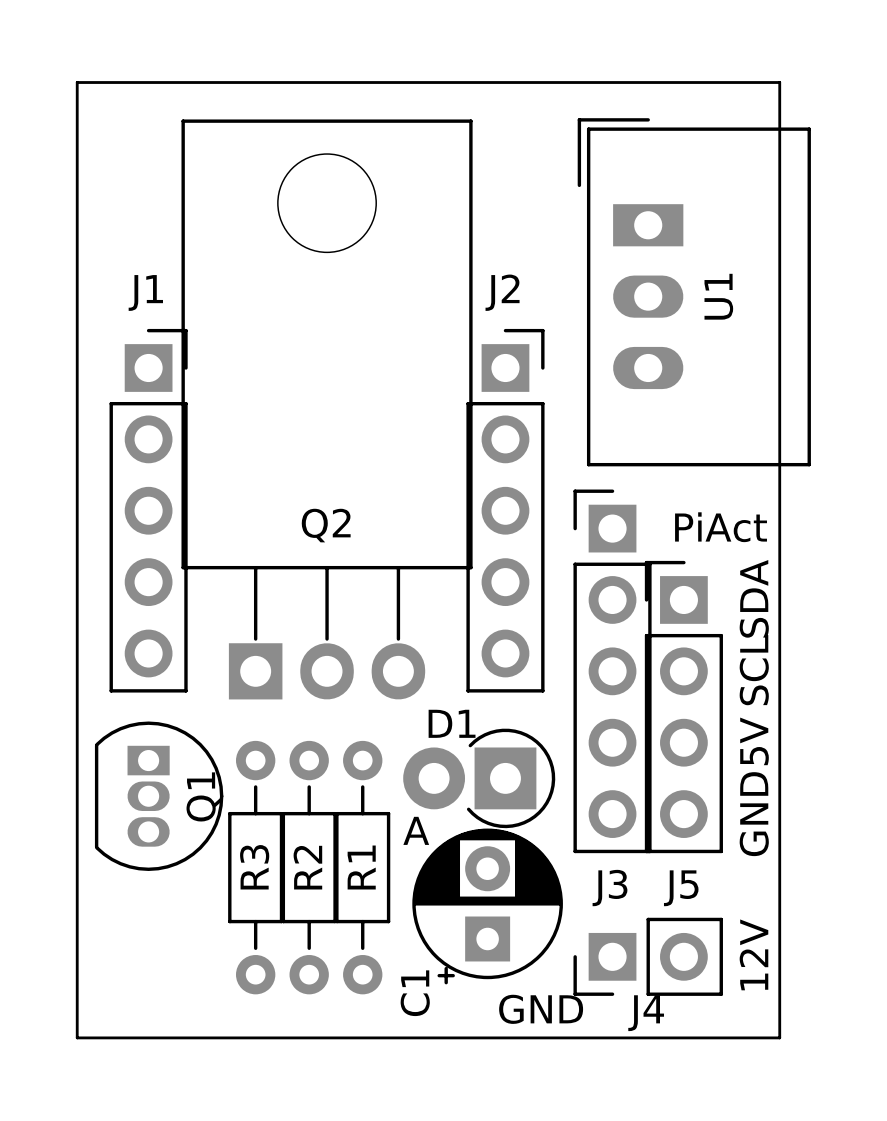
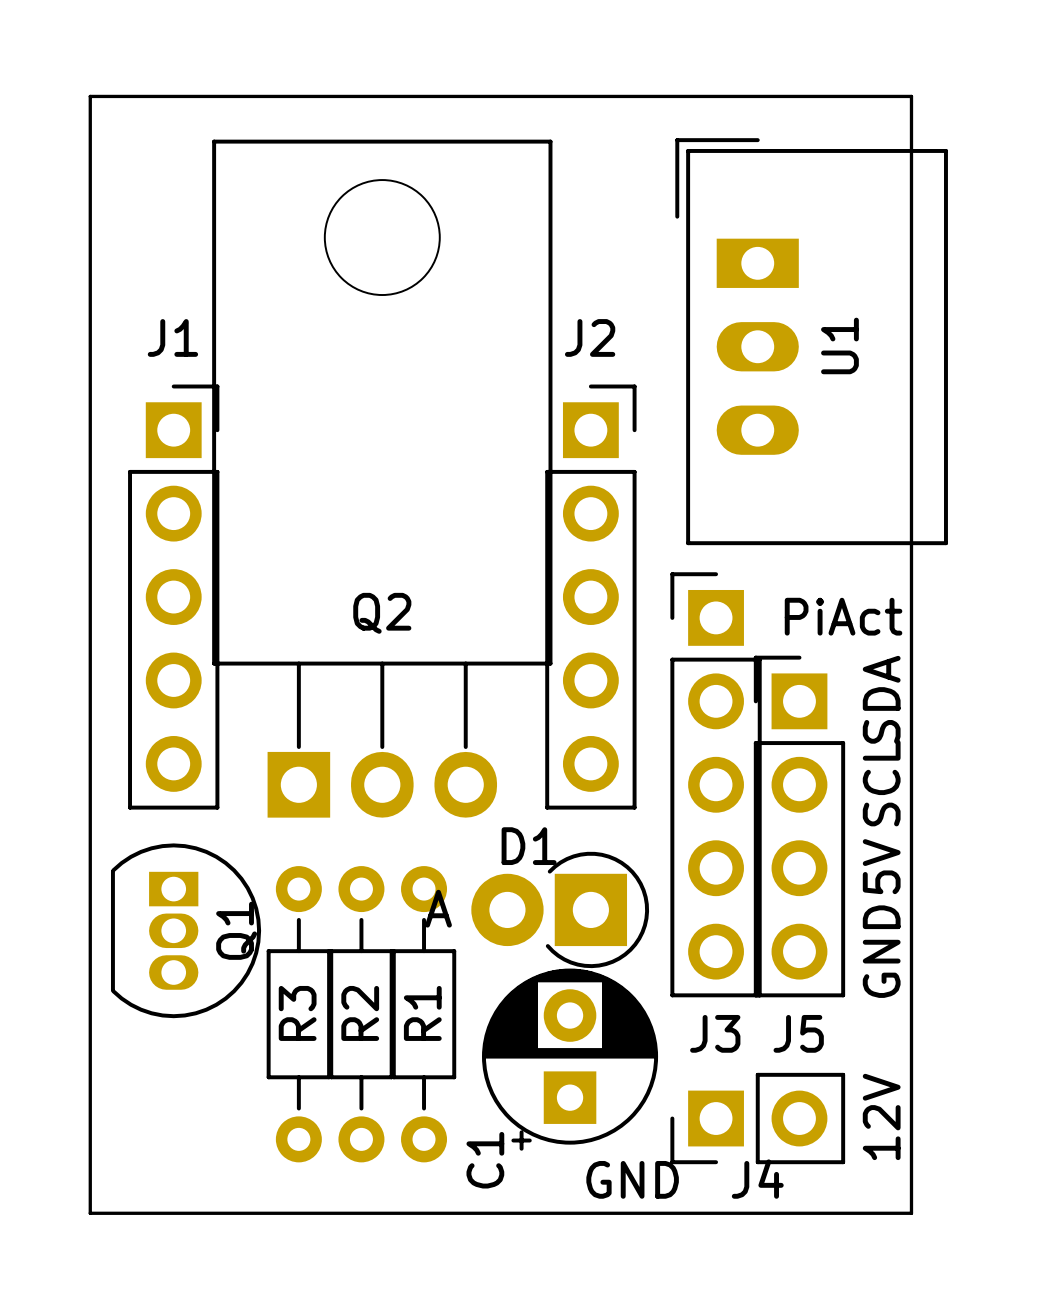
D1 text position: A (416, 830) -> A (438, 908)

